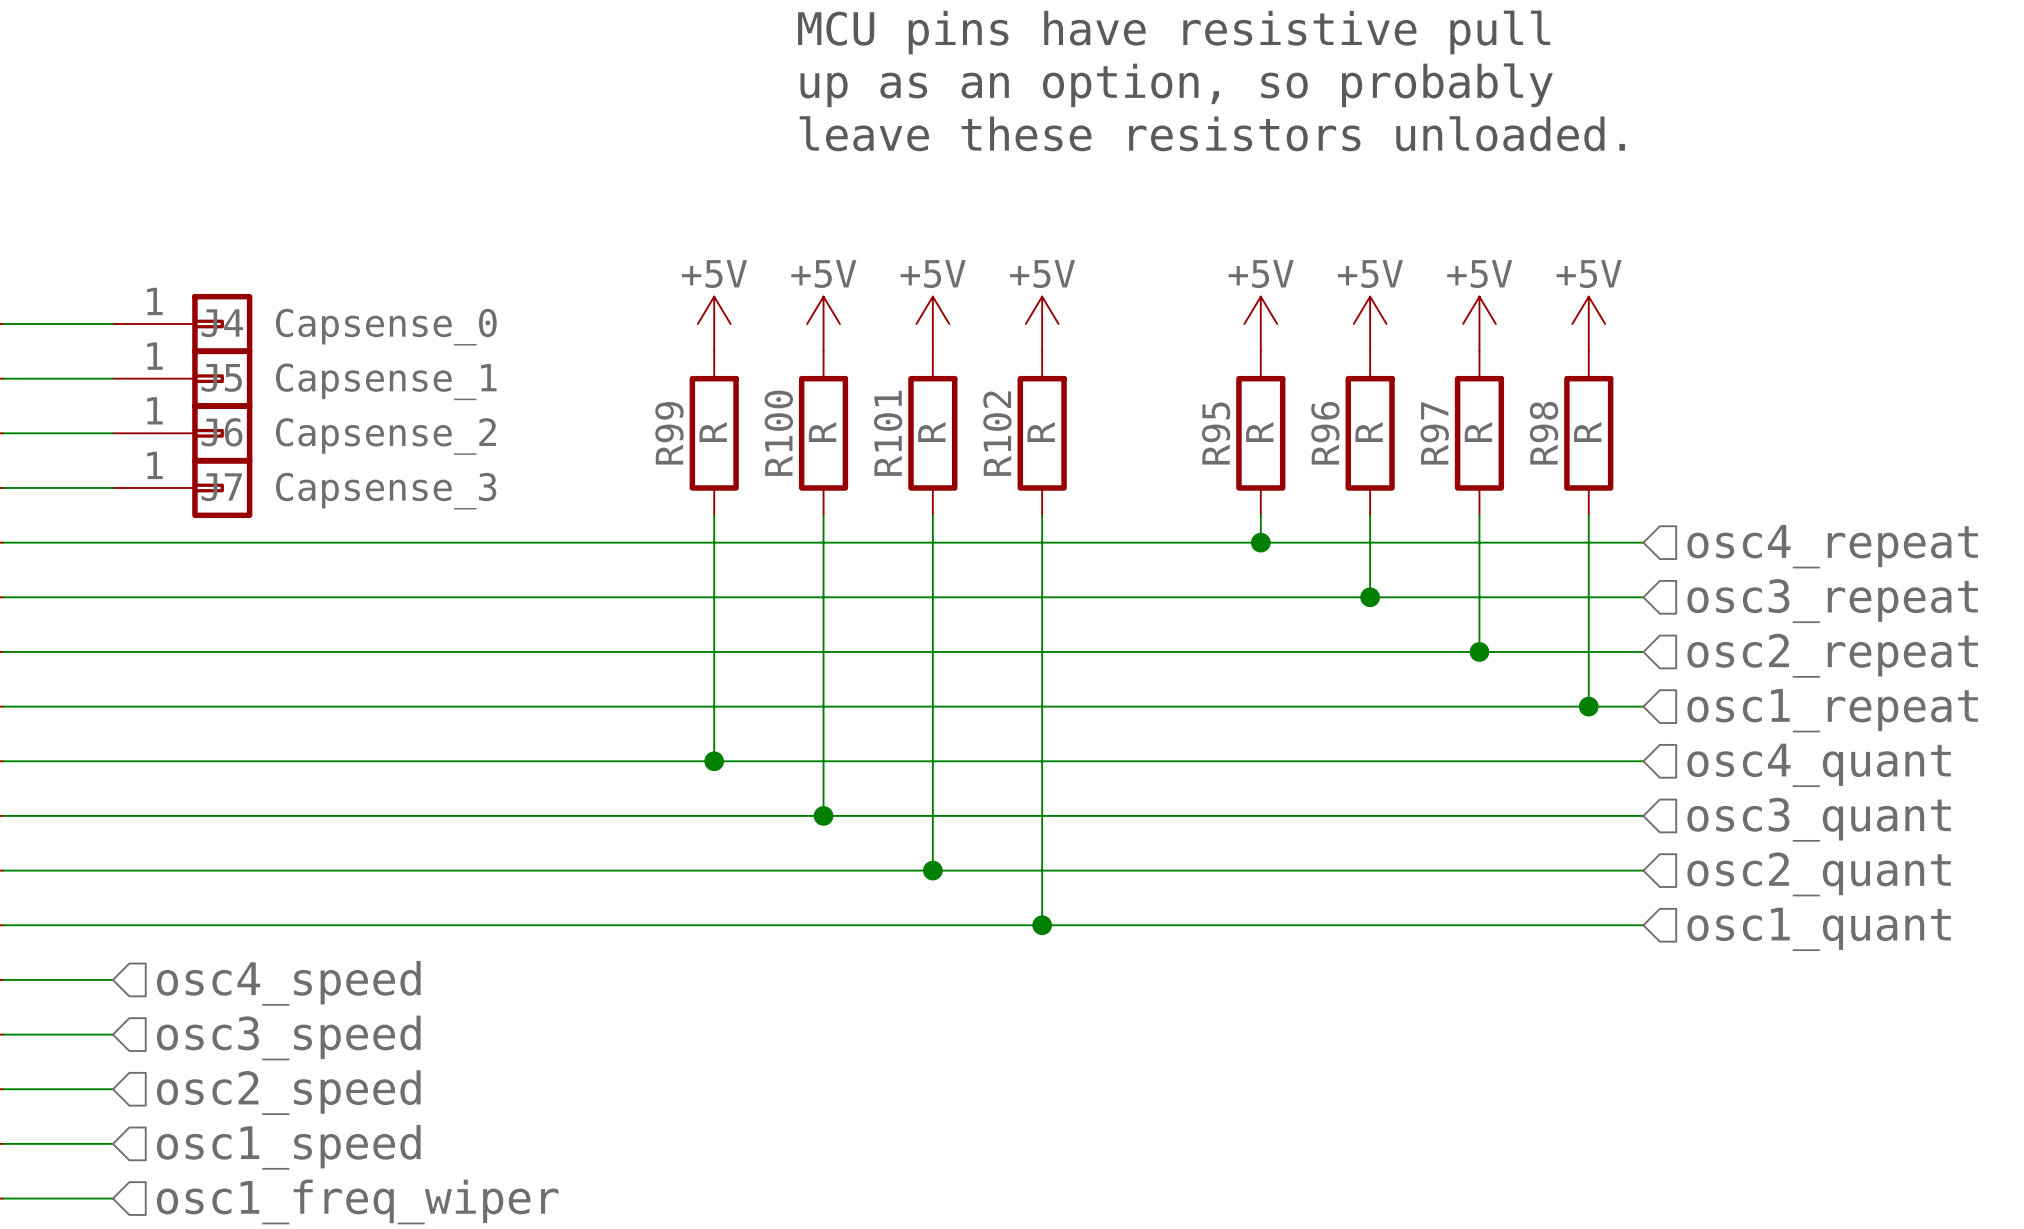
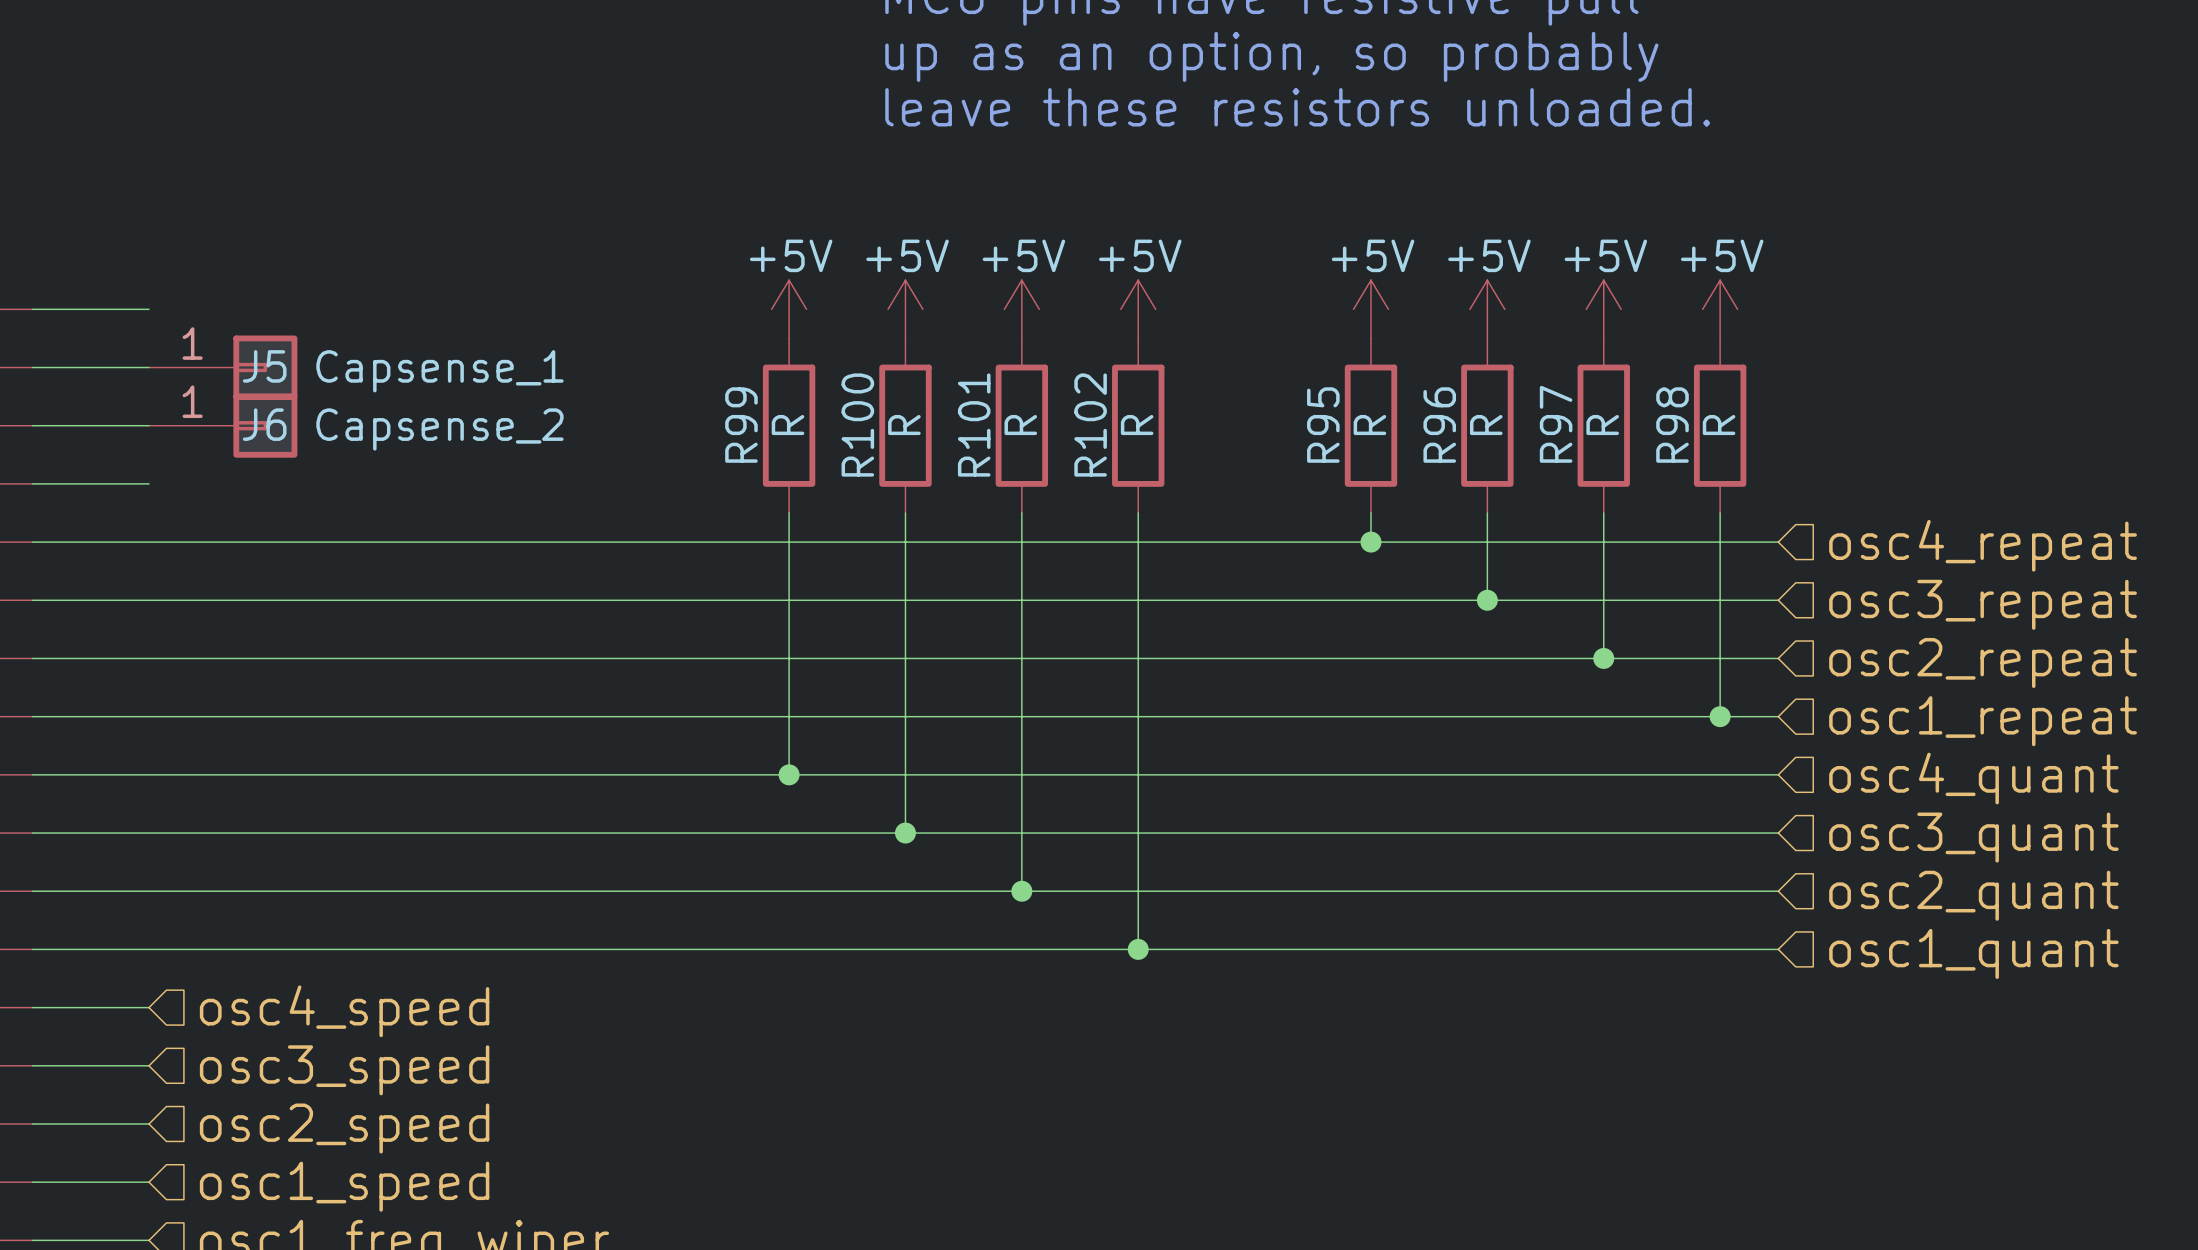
J4: Capsense_0 (182, 324) -> none
J7: Capsense_3 (182, 487) -> none

